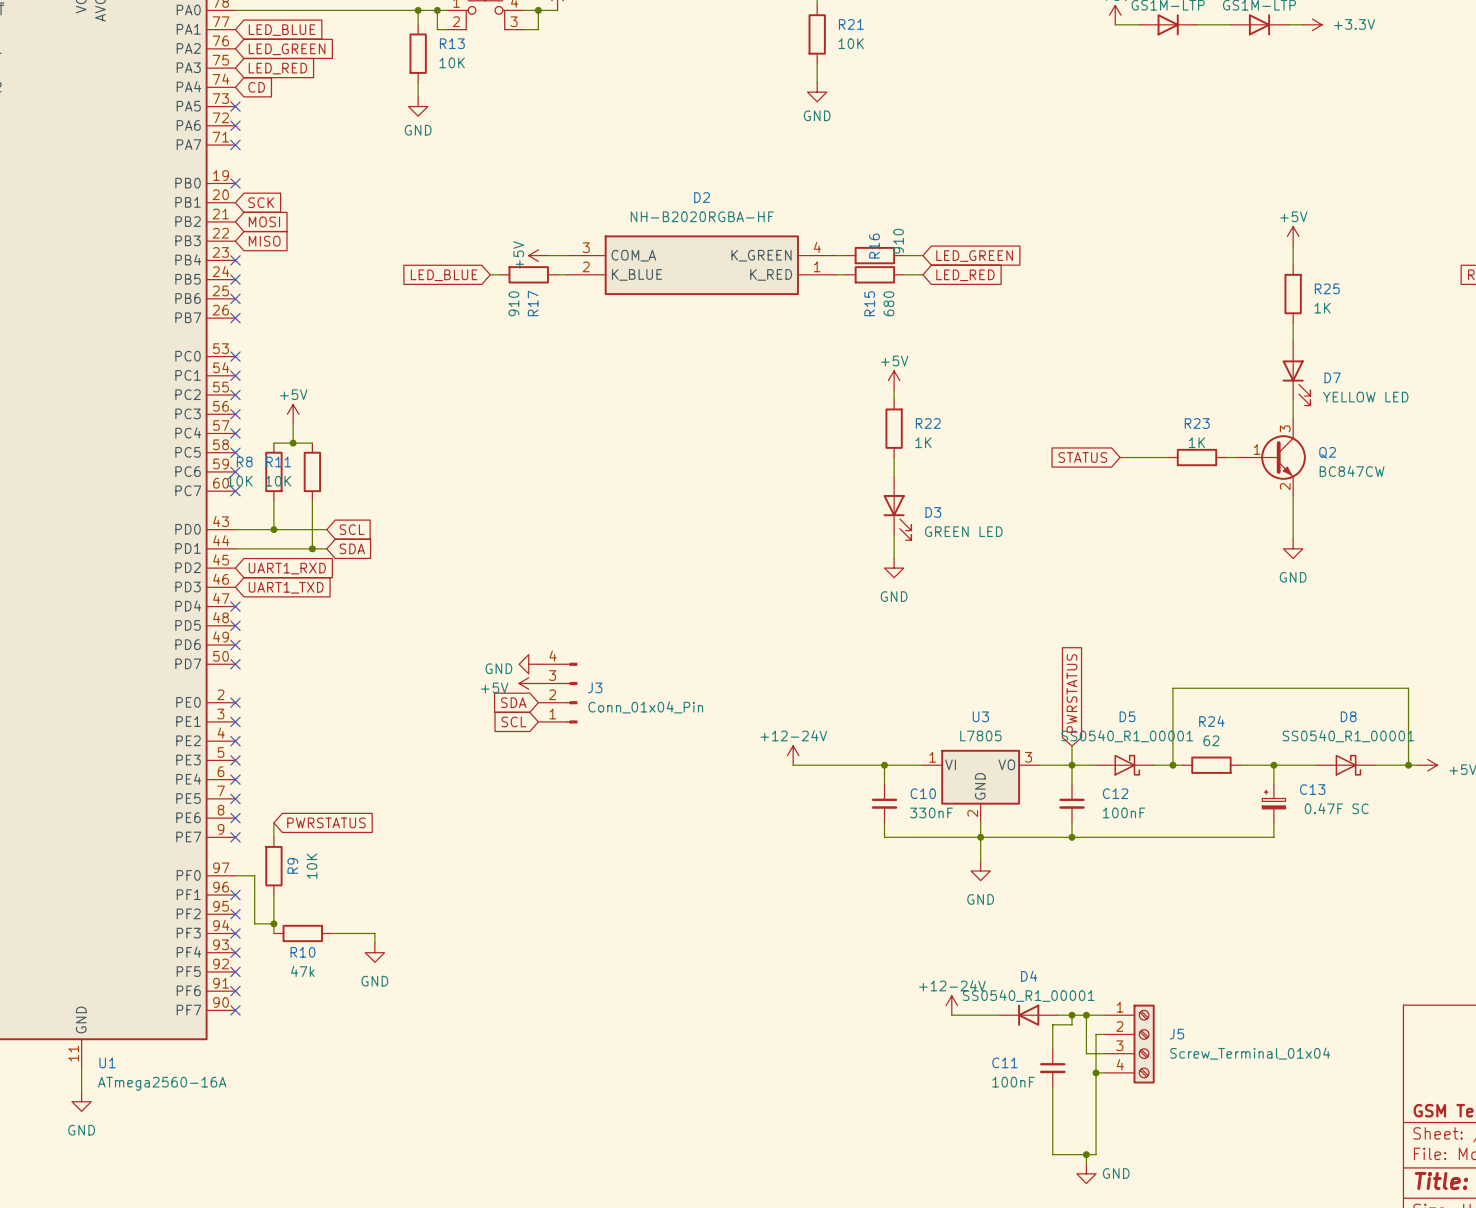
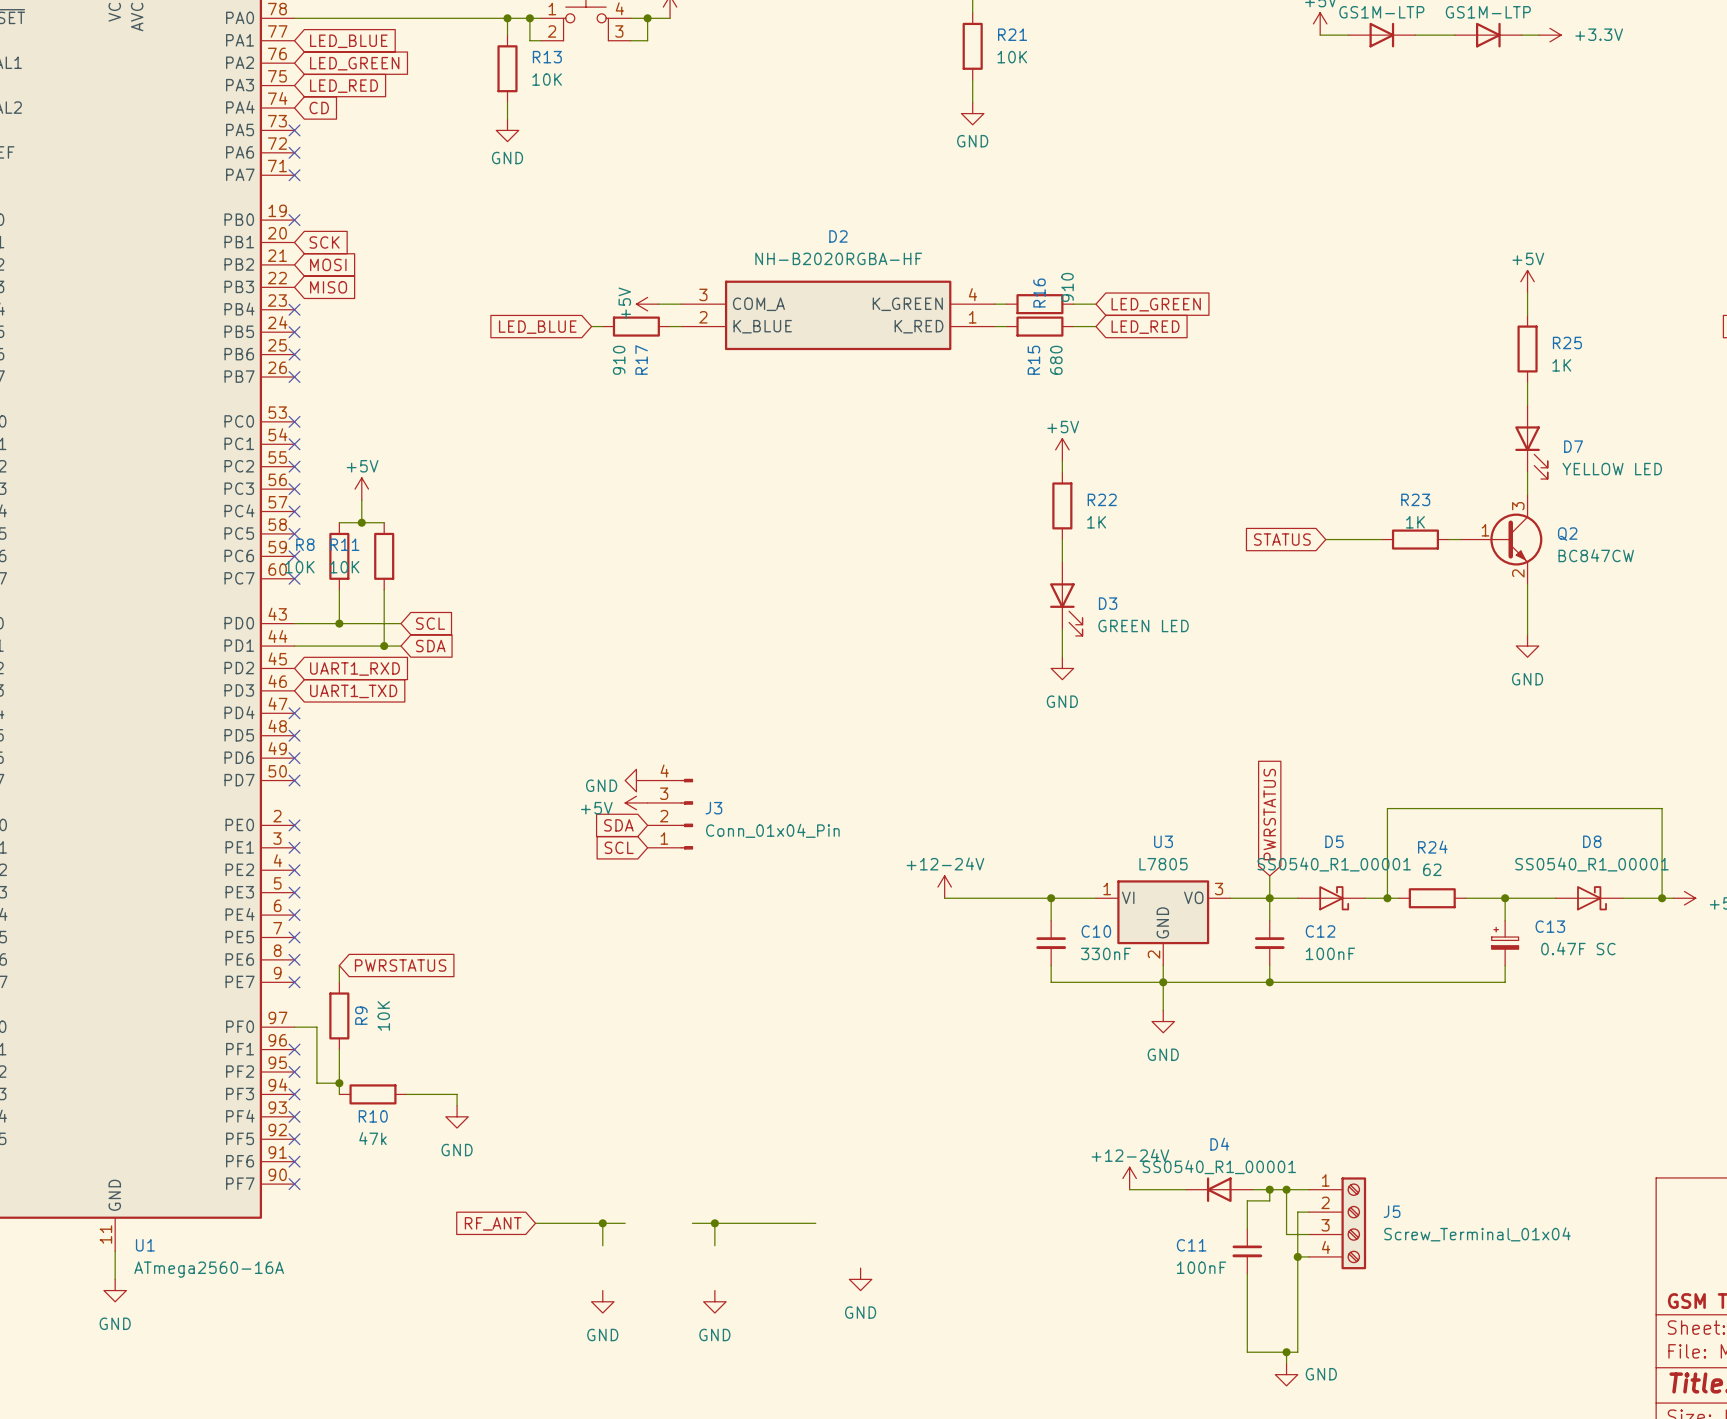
global label: none -> RF_ANT (493, 1223)
wire: none -> (535, 1223) (625, 1223)
wire: none -> (602, 1223) (602, 1245)
junction: none -> (602, 1223)
wire: none -> (692, 1223) (815, 1223)
wire: none -> (714, 1223) (714, 1245)
junction: none -> (714, 1223)
power symbol: none -> GND (860, 1279)
power symbol: none -> GND (602, 1301)
power symbol: none -> GND (714, 1301)

